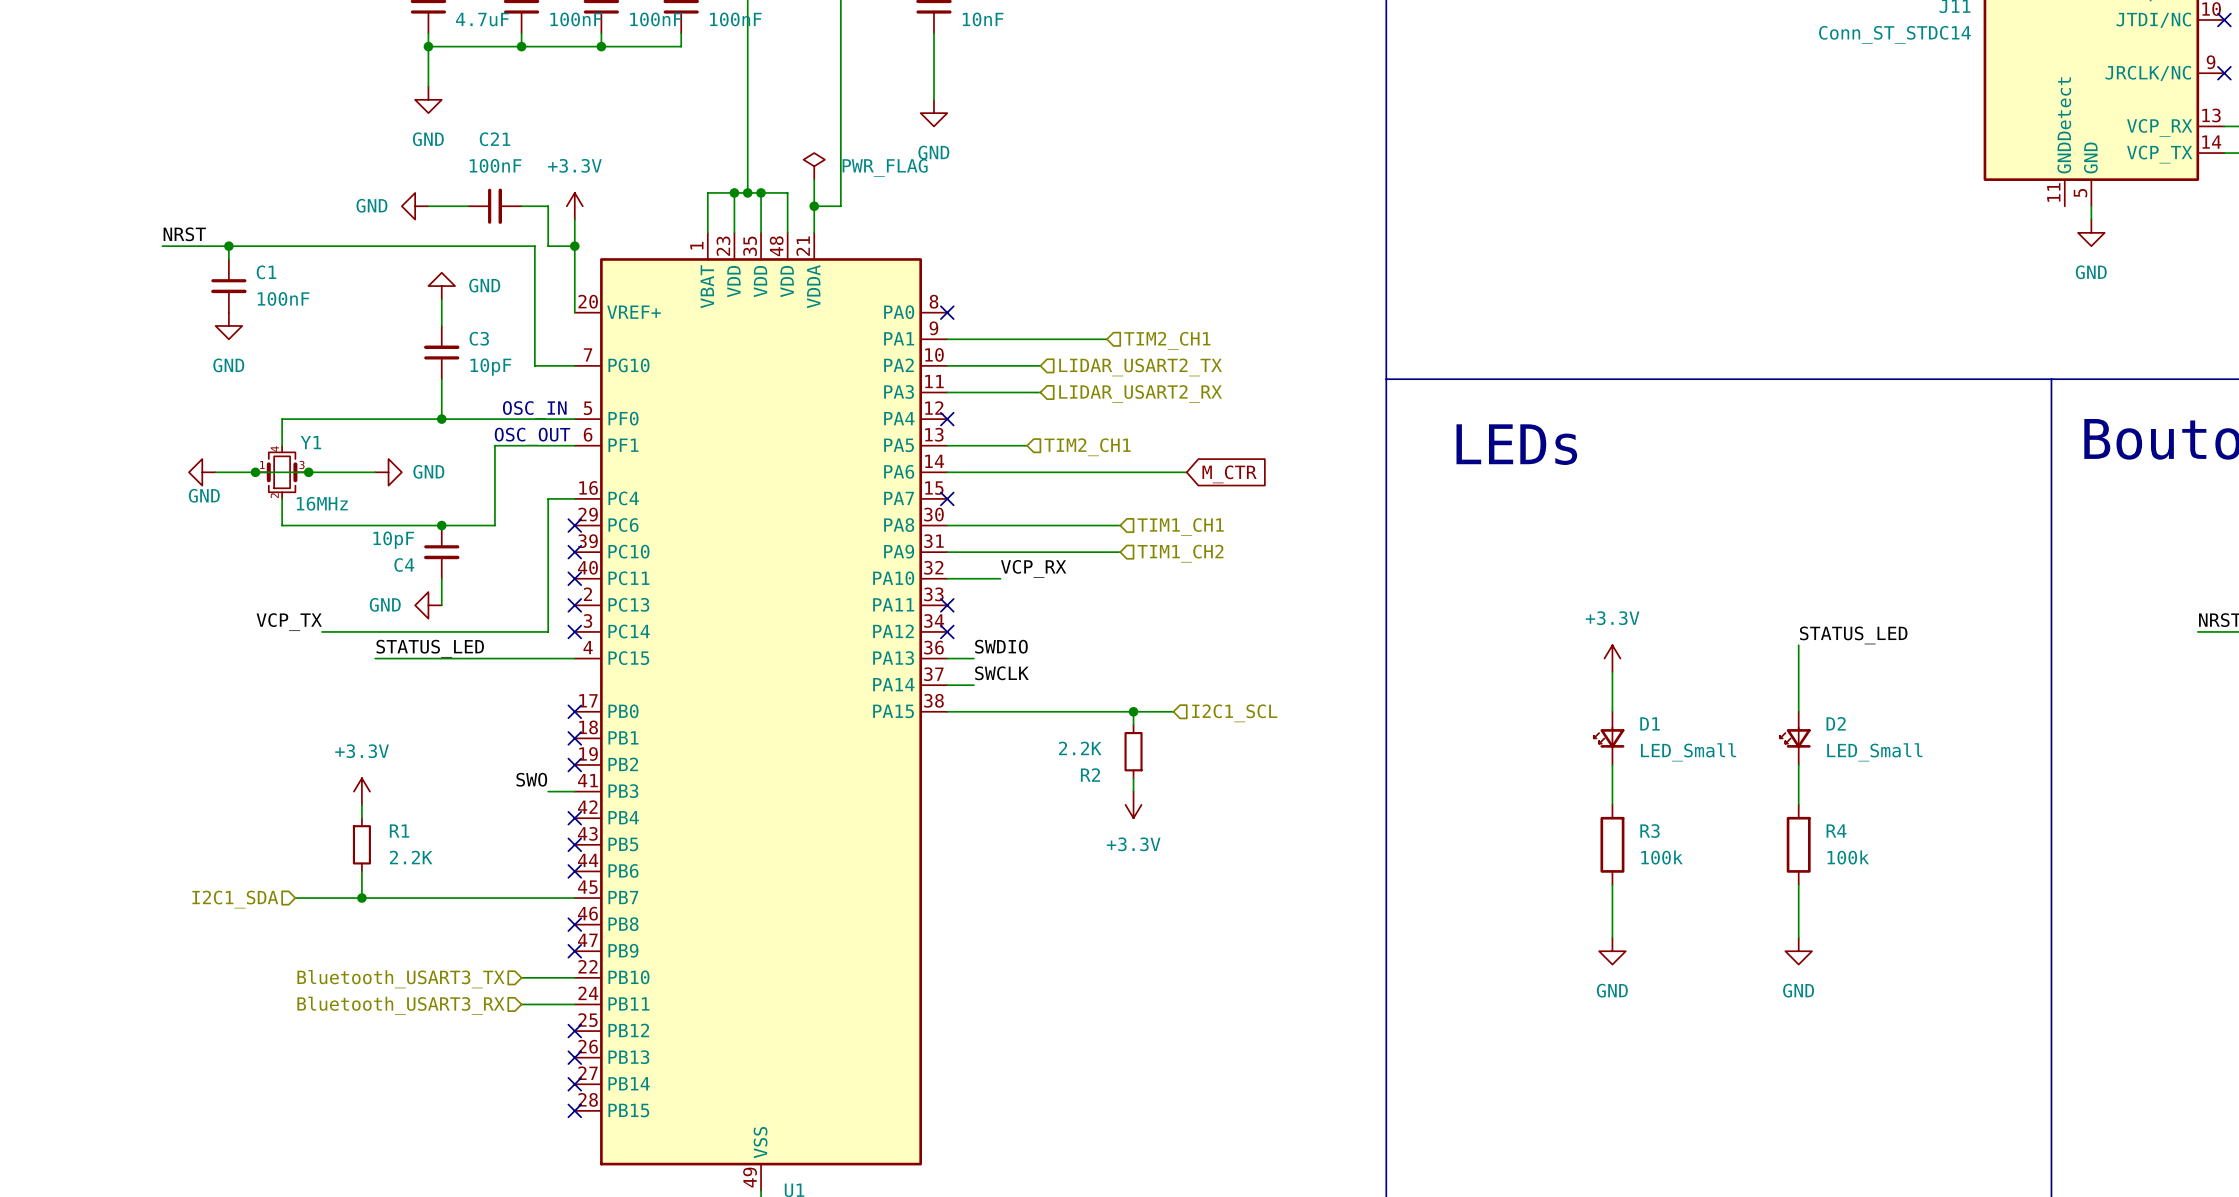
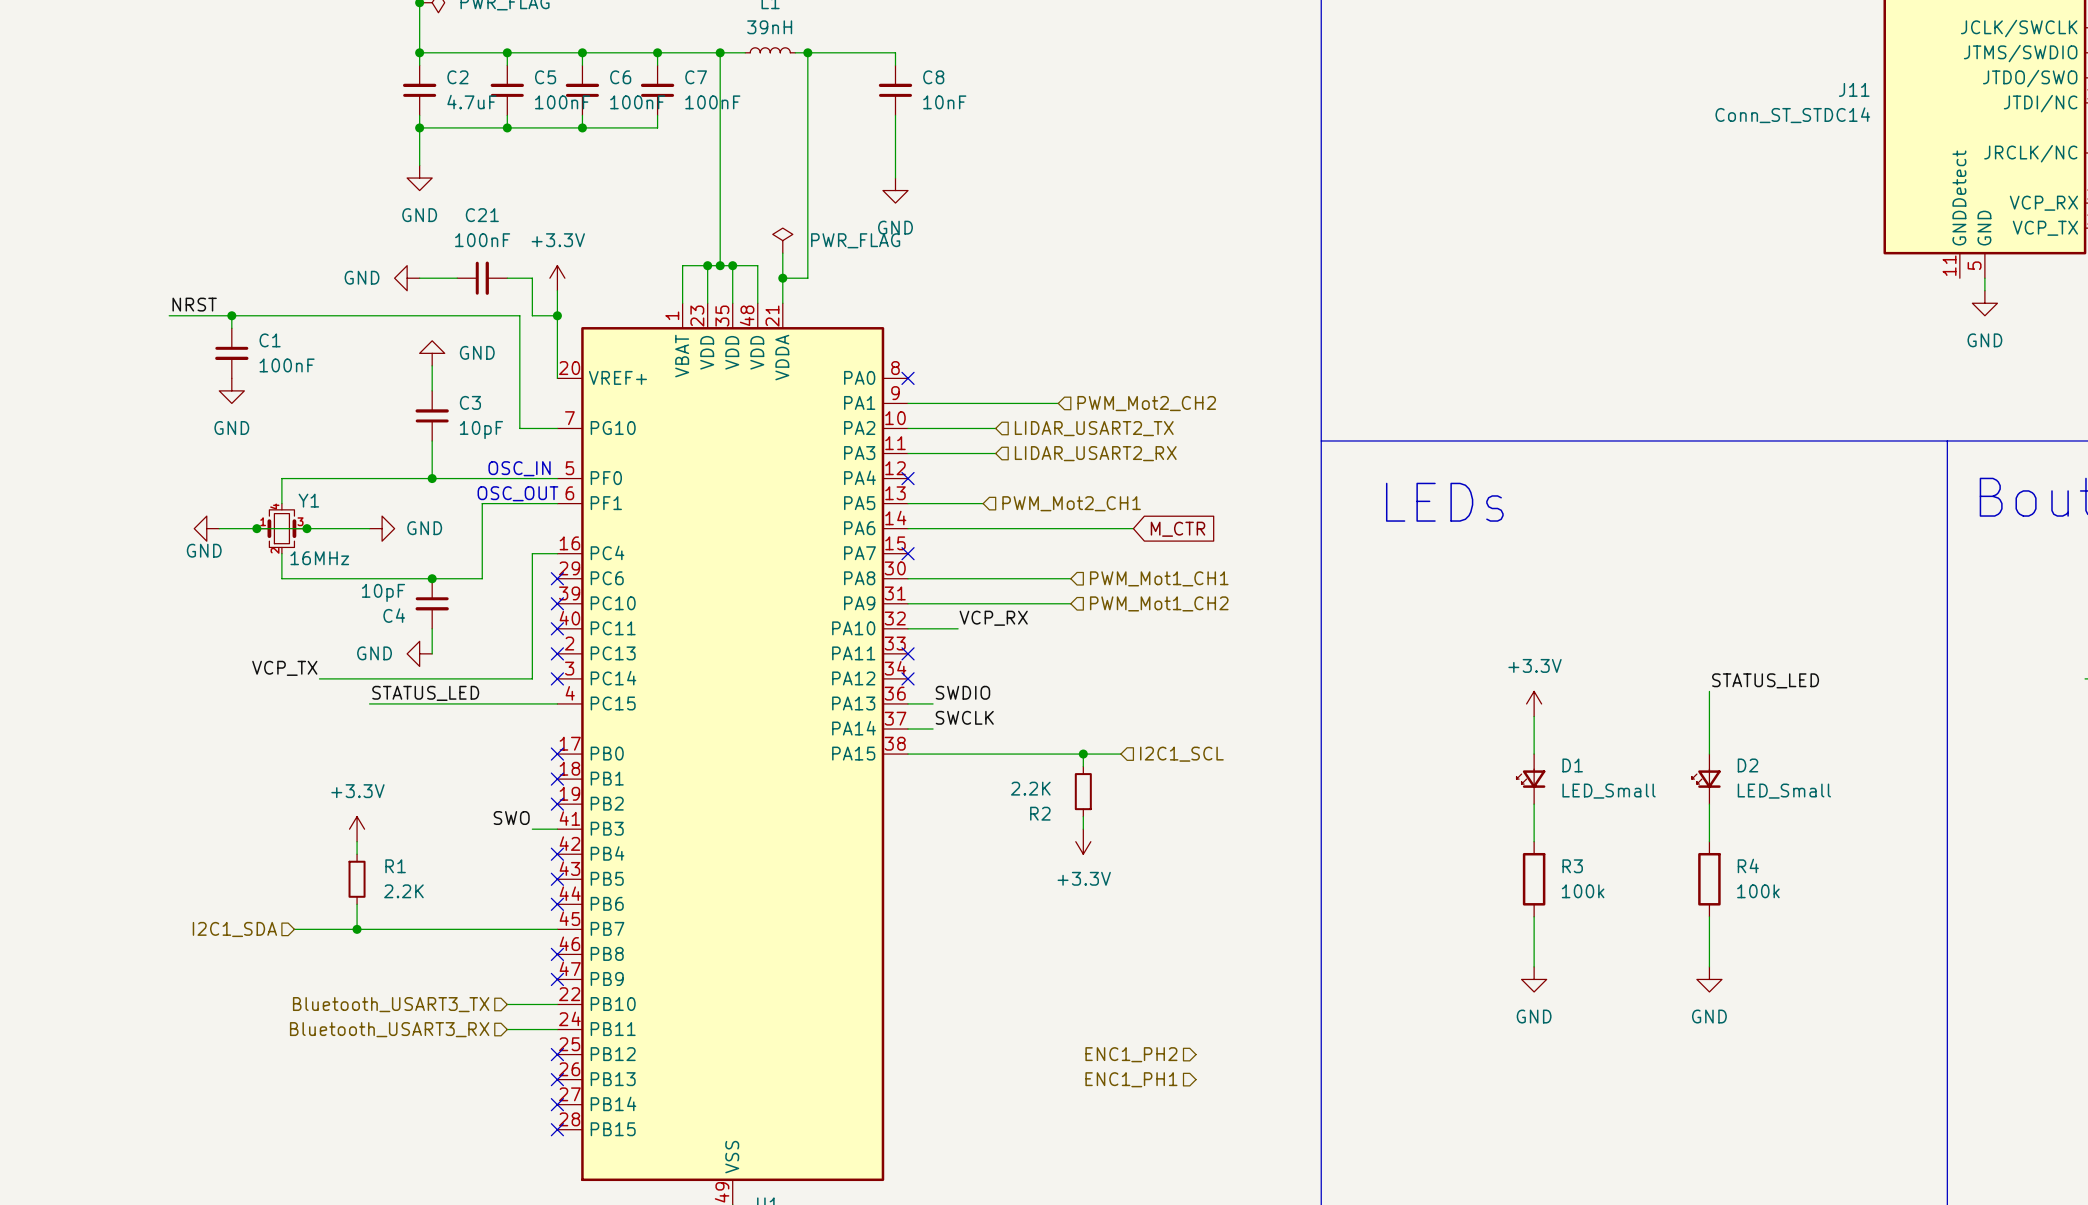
hierarchical label: TIM2_CH1 (1167, 340) -> PWM_Mot2_CH2 (1146, 403)
hierarchical label: TIM2_CH1 (1087, 447) -> PWM_Mot2_CH1 (1071, 503)
hierarchical label: TIM1_CH1 (1180, 527) -> PWM_Mot1_CH1 (1159, 578)
hierarchical label: TIM1_CH2 (1180, 553) -> PWM_Mot1_CH2 (1159, 603)
hierarchical label: none -> ENC1_PH2 (1131, 1054)
hierarchical label: none -> ENC1_PH1 (1131, 1079)

